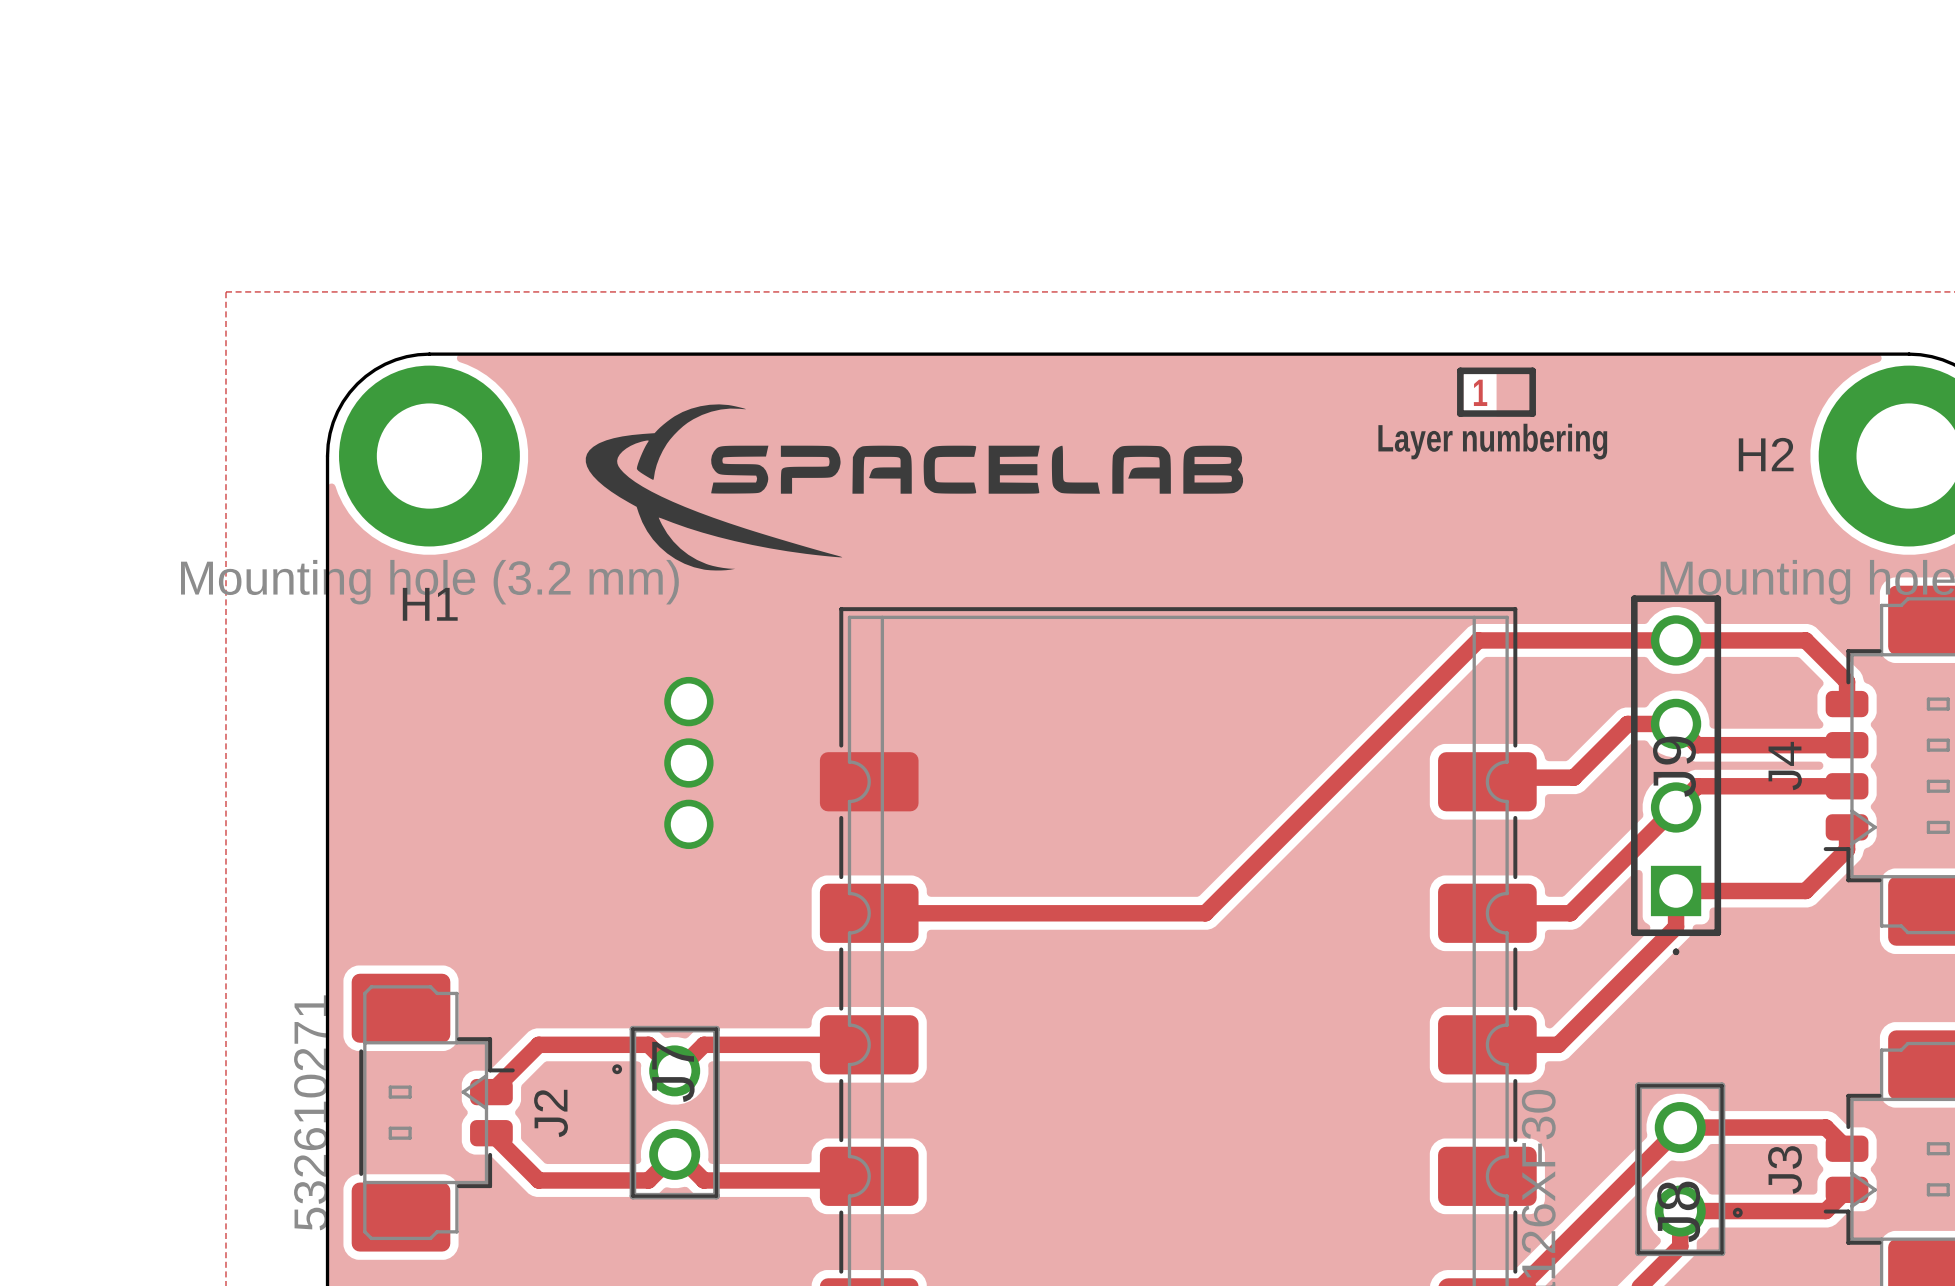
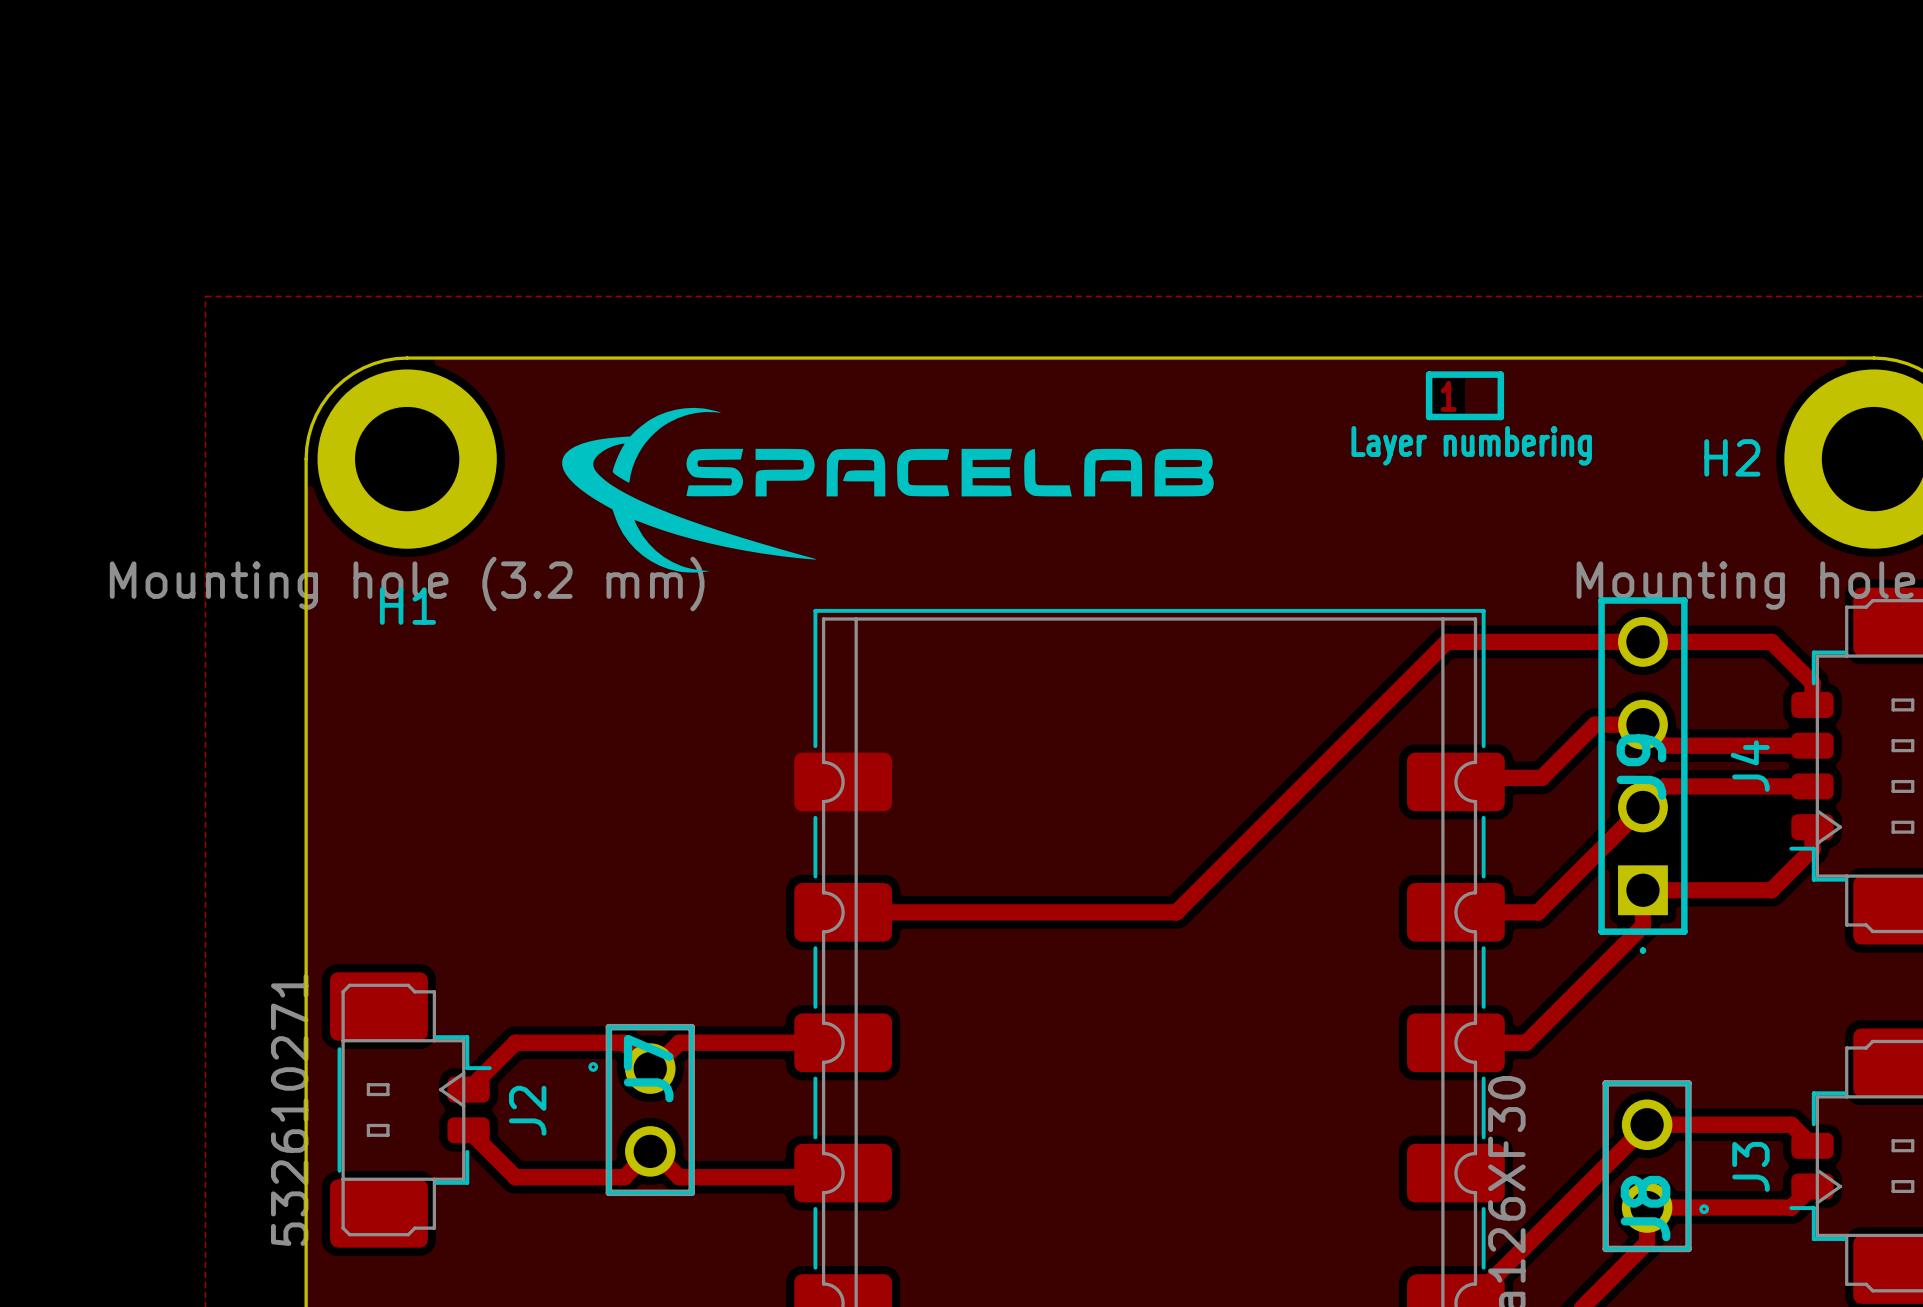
via: (688, 701) -> none
via: (688, 762) -> none
via: (688, 824) -> none

